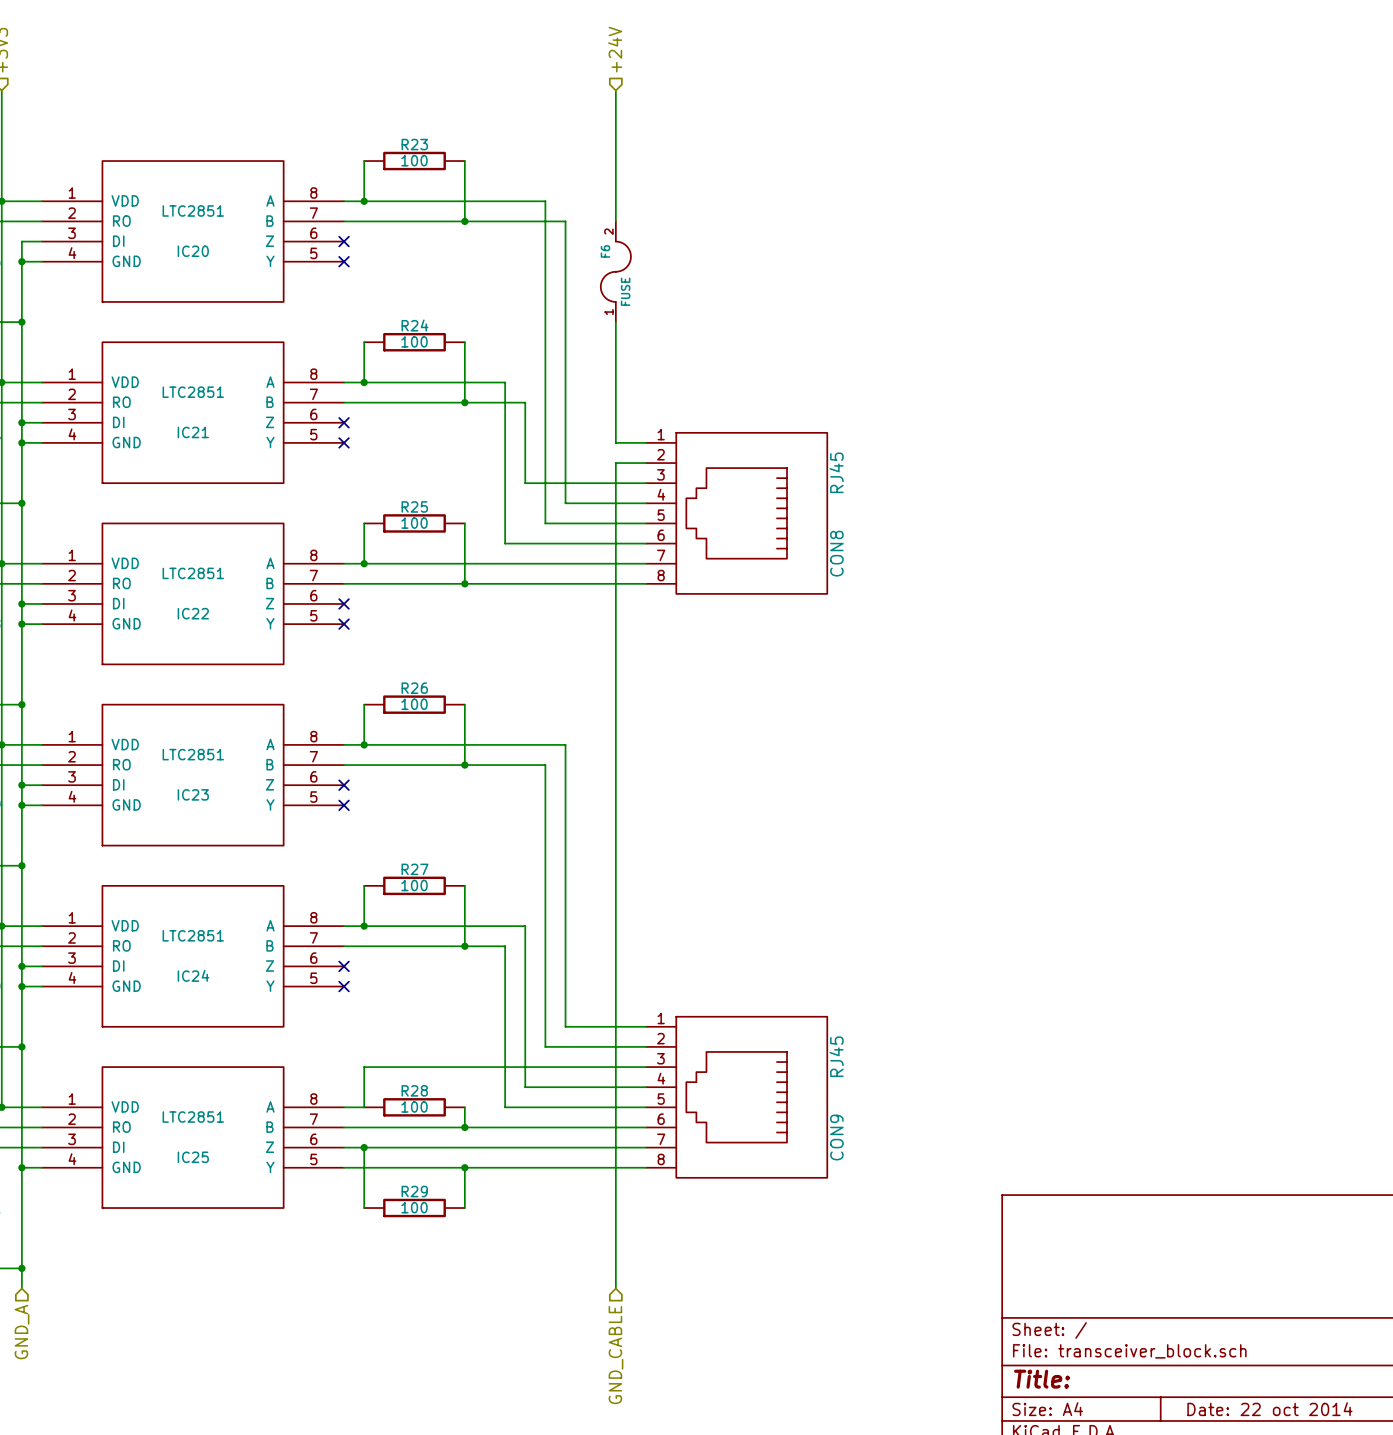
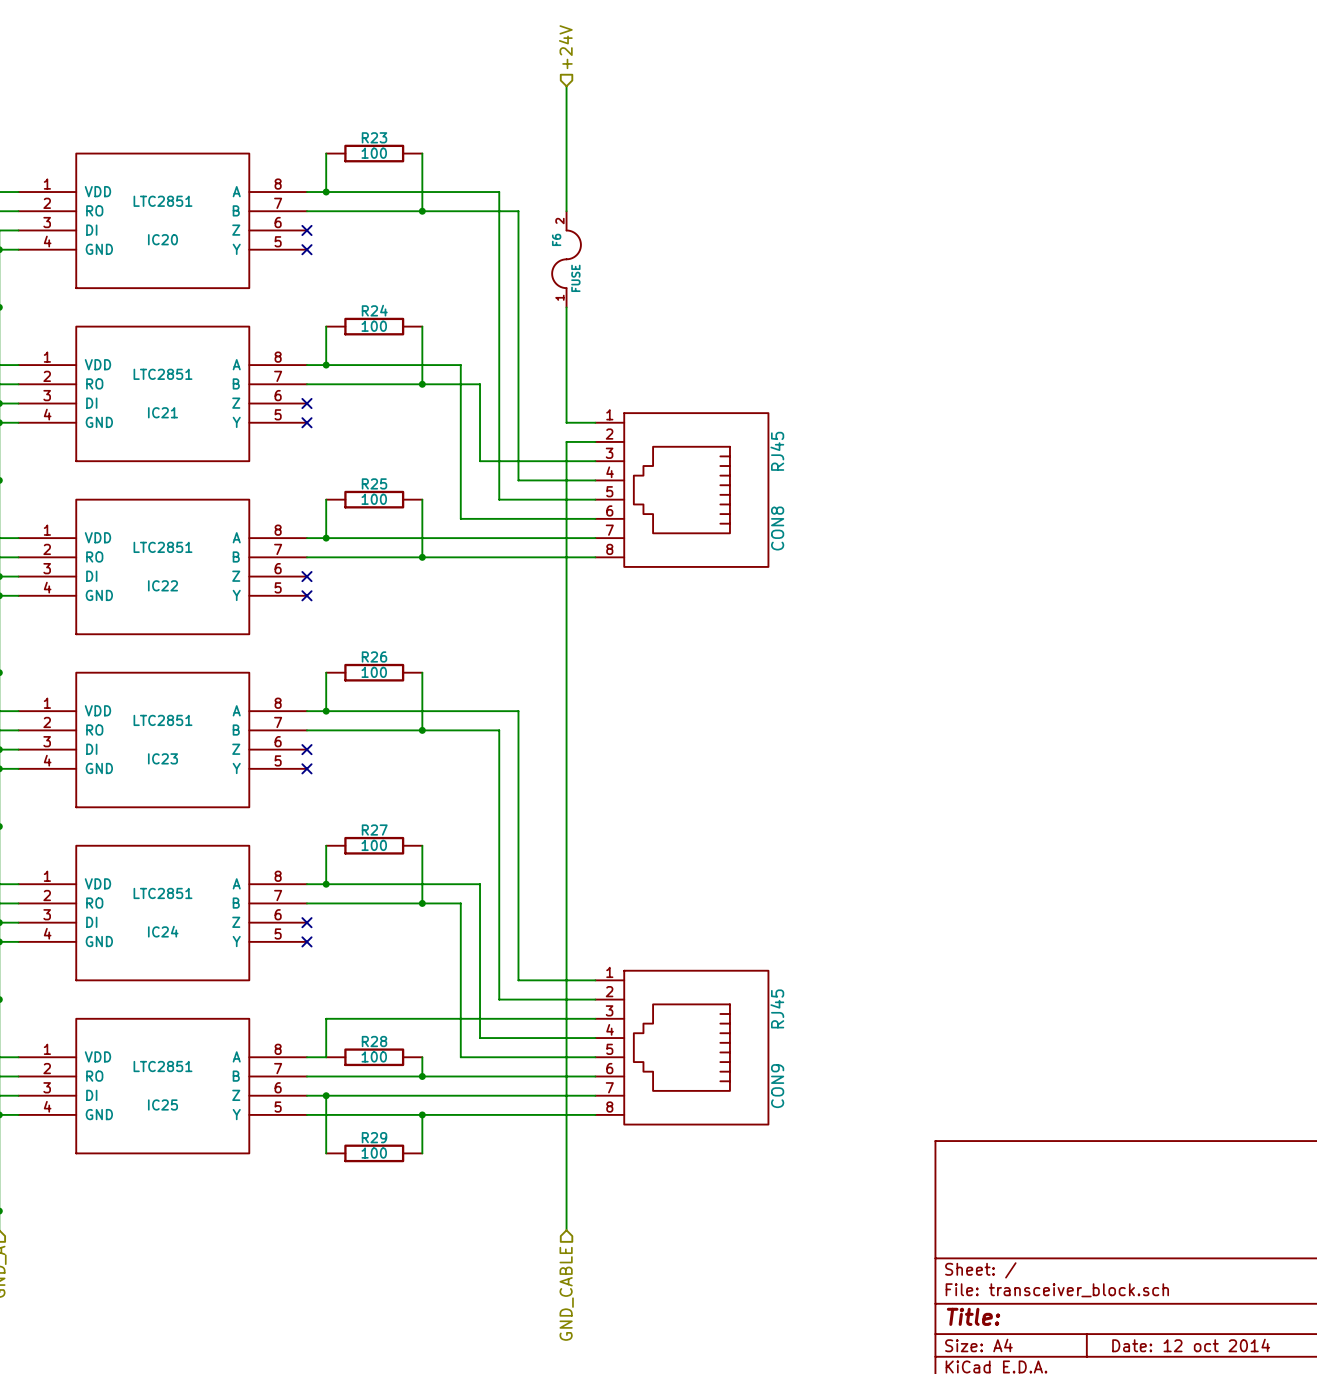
title block: Date: 22 oct 2014 (1269, 1409) -> Date: 12 oct 2014 (1191, 1345)

